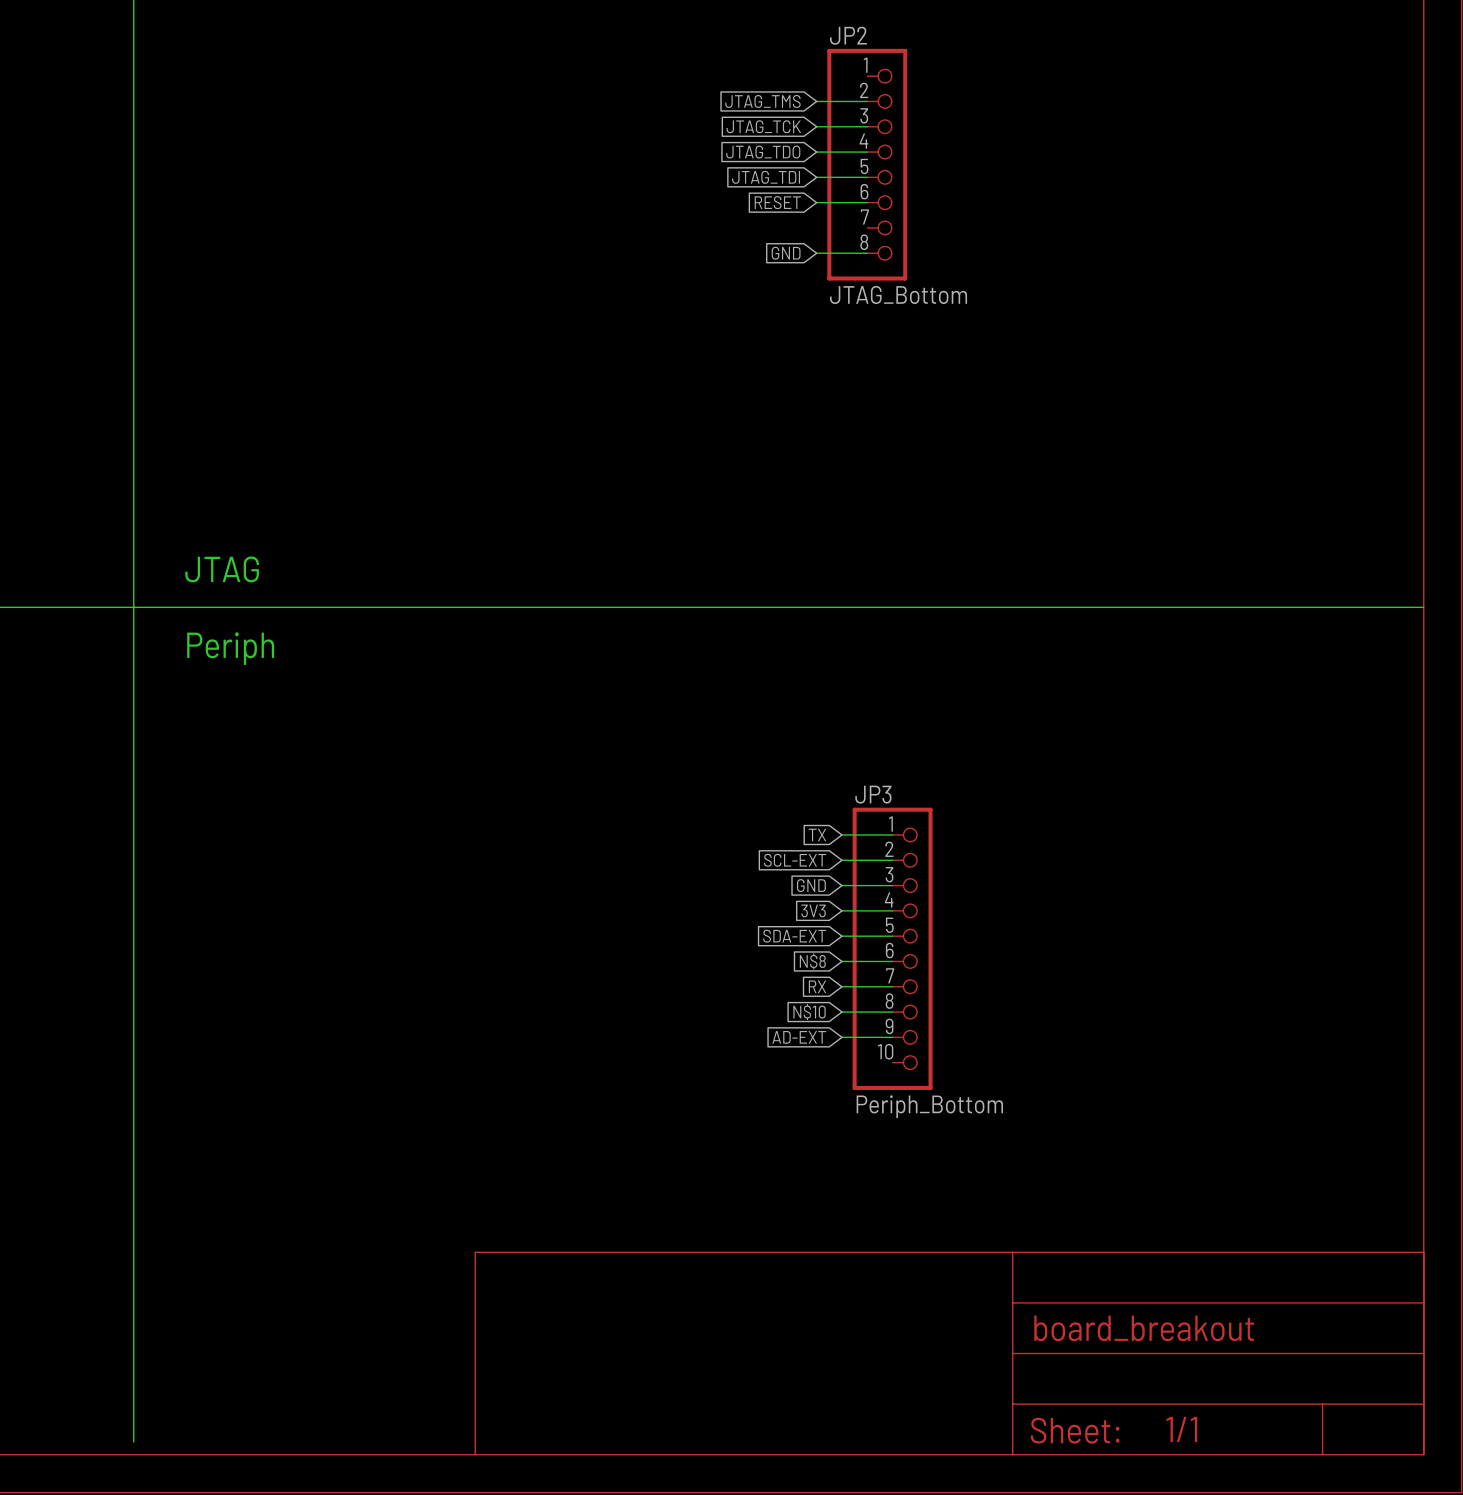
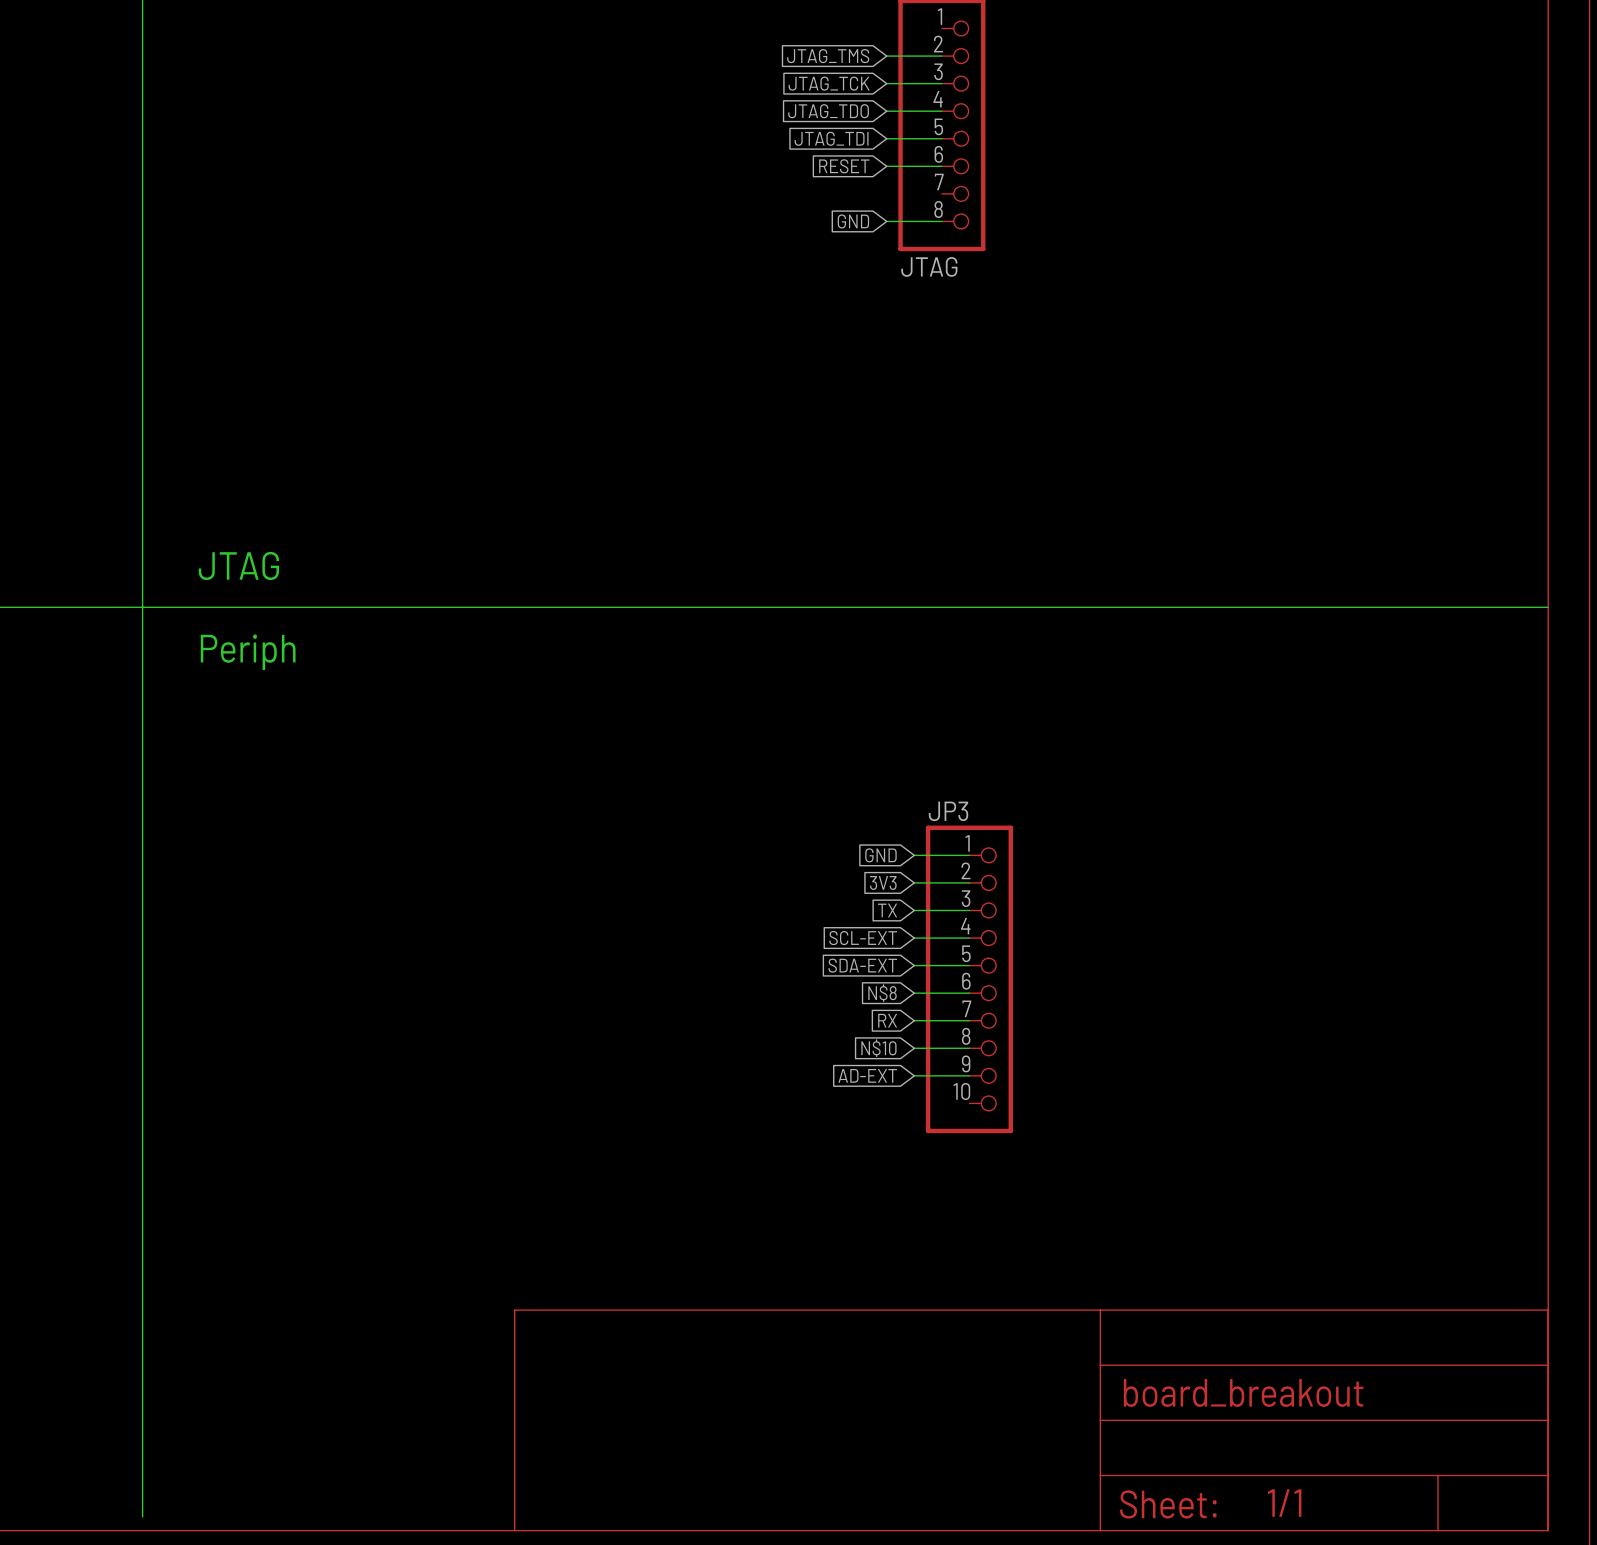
JP2 value: JTAG_Bottom (898, 294) -> JTAG (929, 266)
global label: TX (817, 834) -> GND (880, 855)
global label: SCL-EXT (795, 860) -> 3V3 (883, 883)
global label: GND (811, 885) -> TX (887, 910)
global label: 3V3 (813, 910) -> SCL-EXT (863, 938)
JP3 value: Periph_Bottom (929, 1106) -> none

